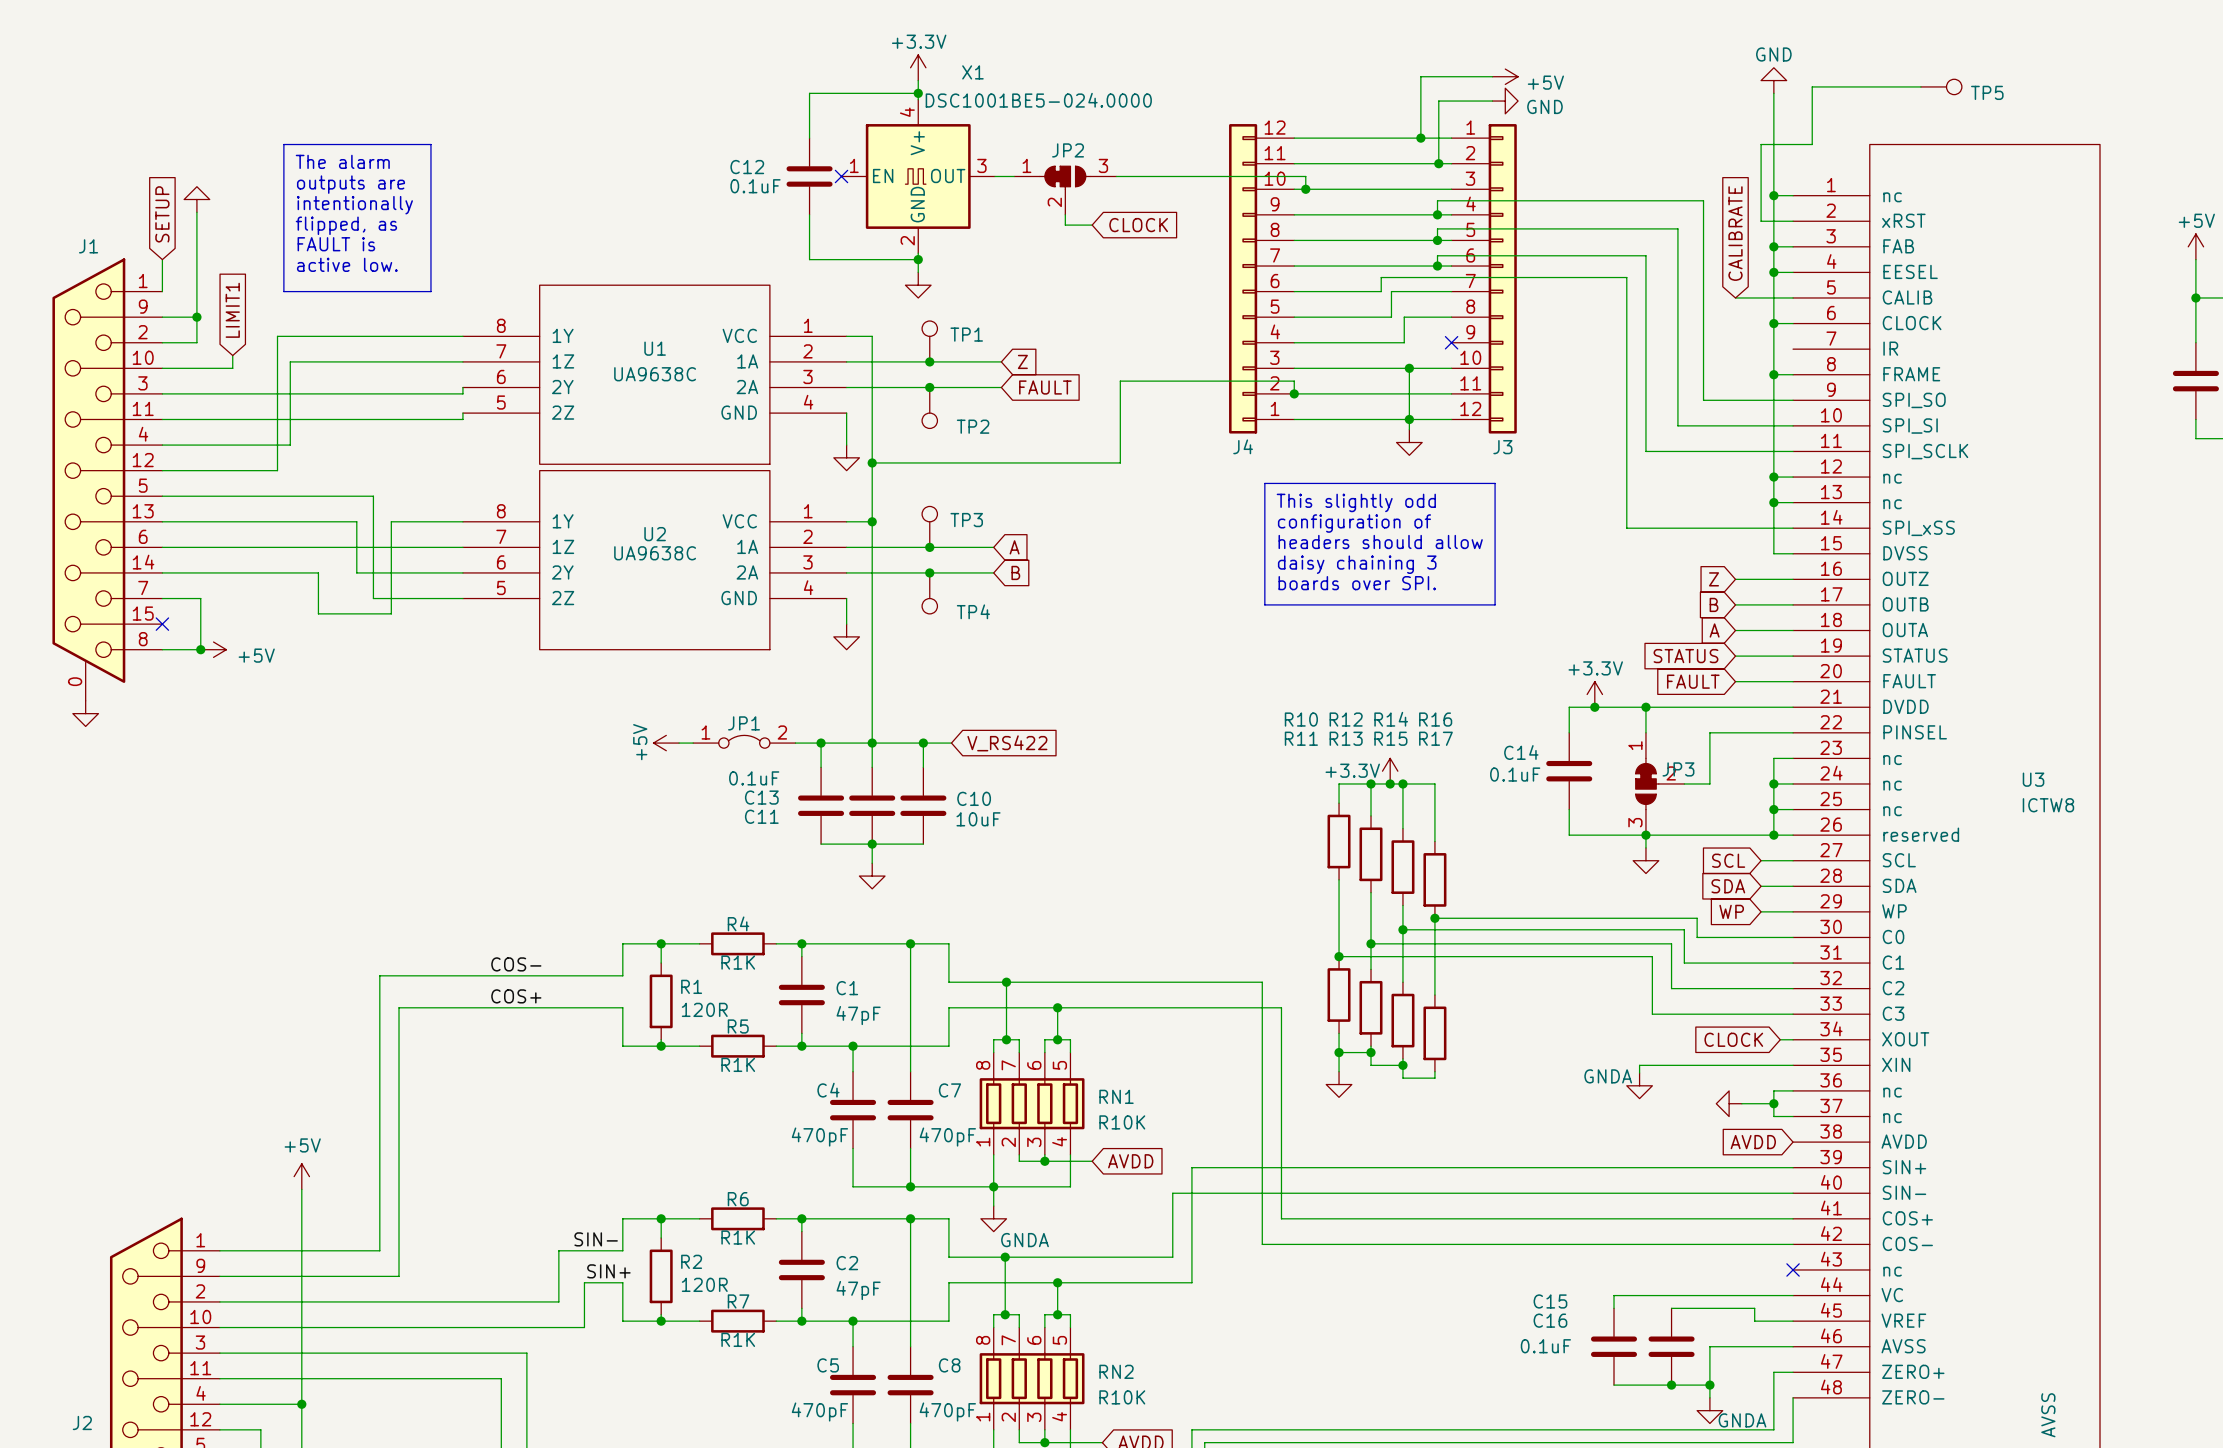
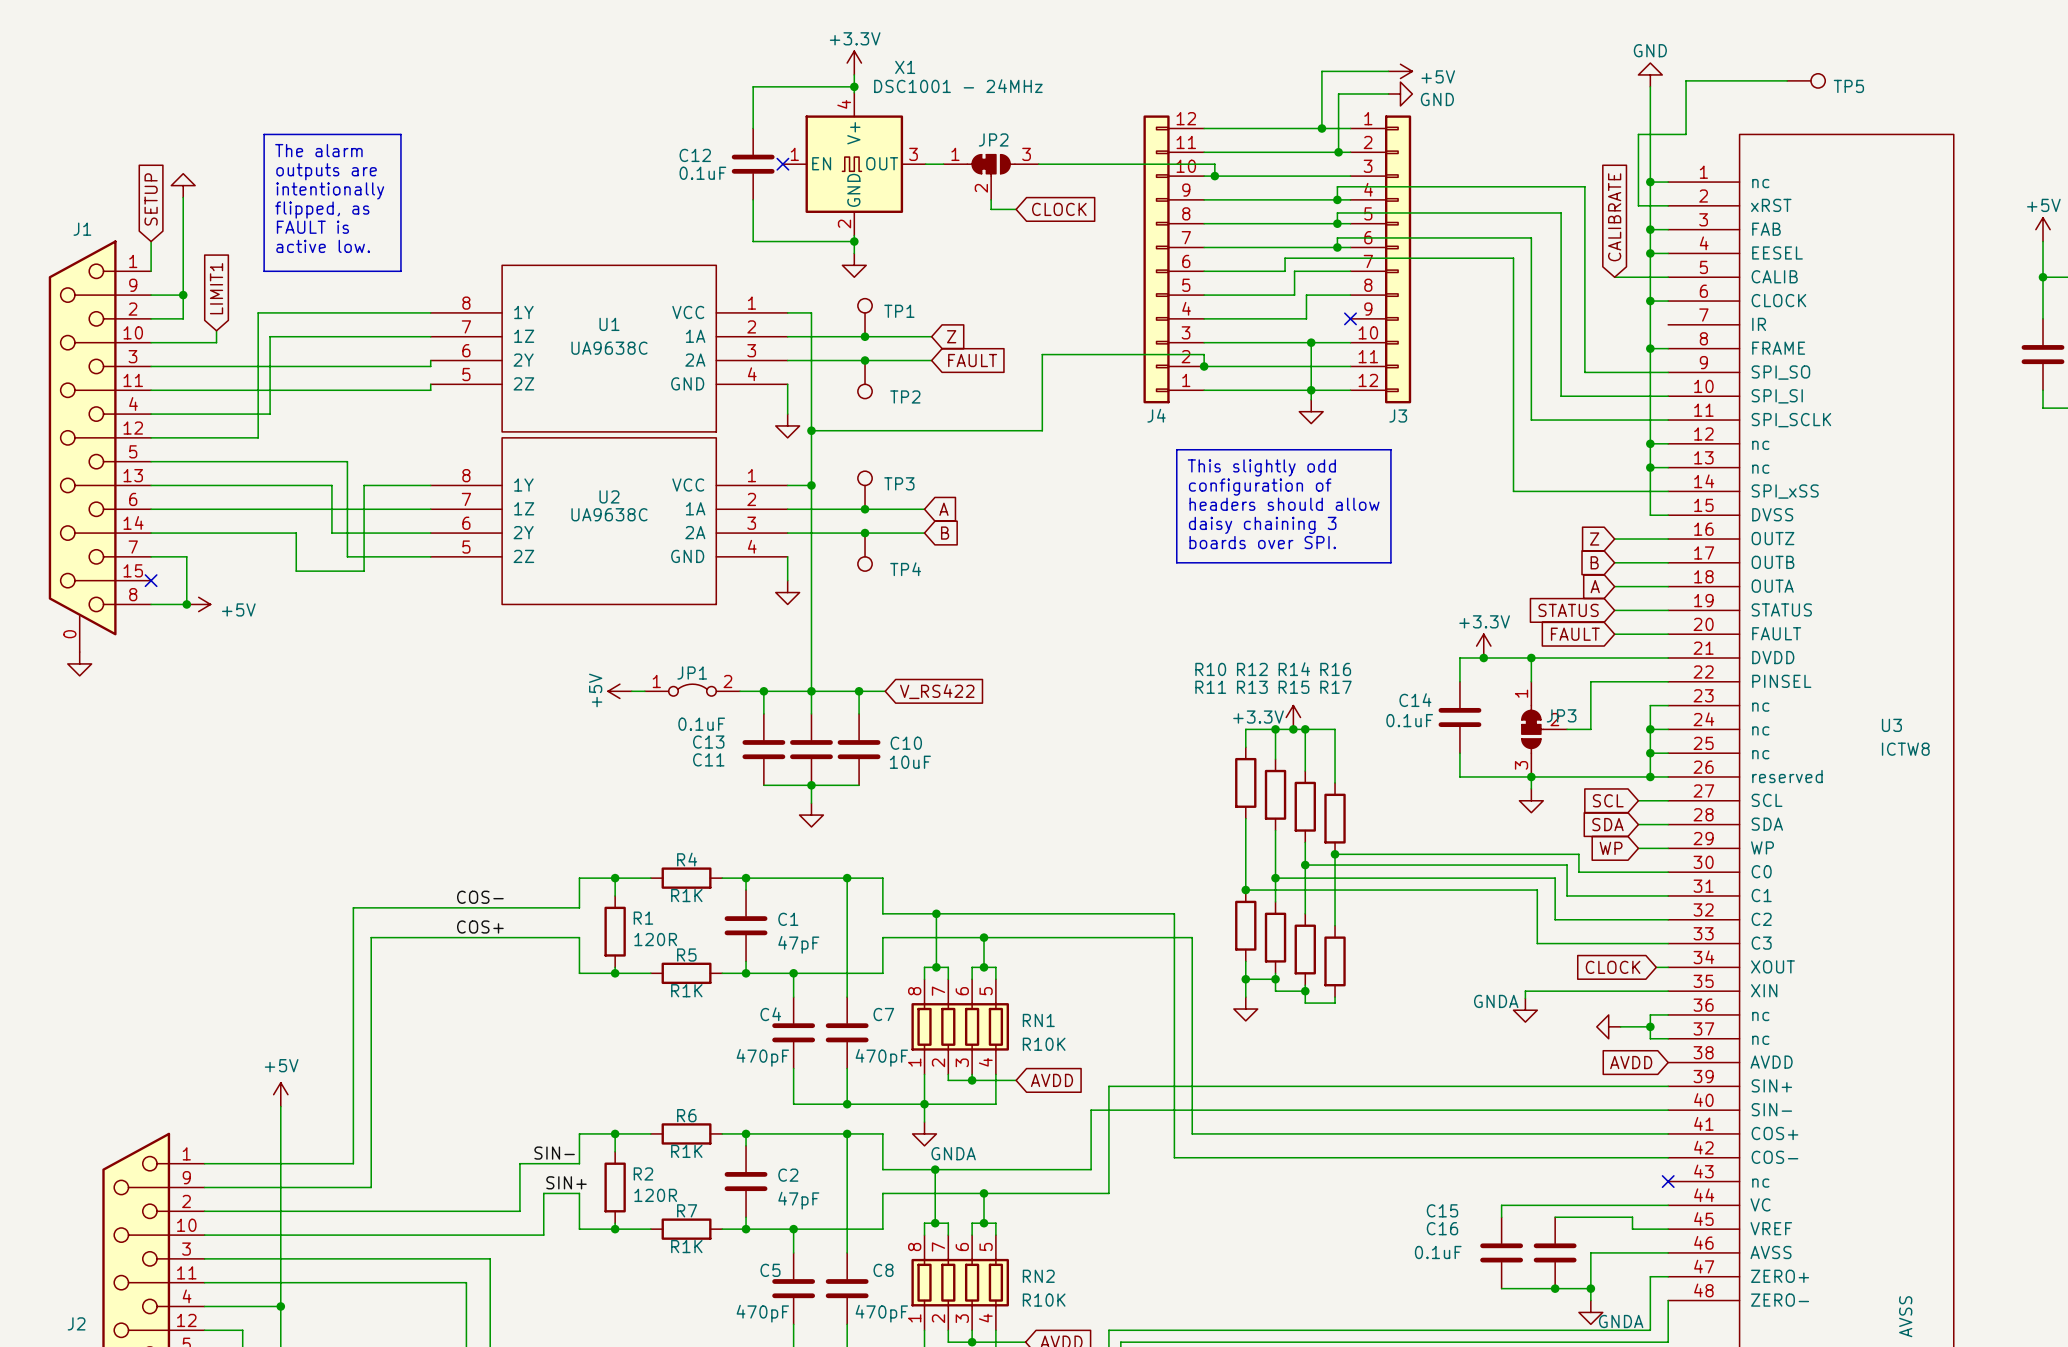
X1 value: DSC1001BE5-024.0000 (1038, 100) -> DSC1001 - 24MHz (958, 86)

